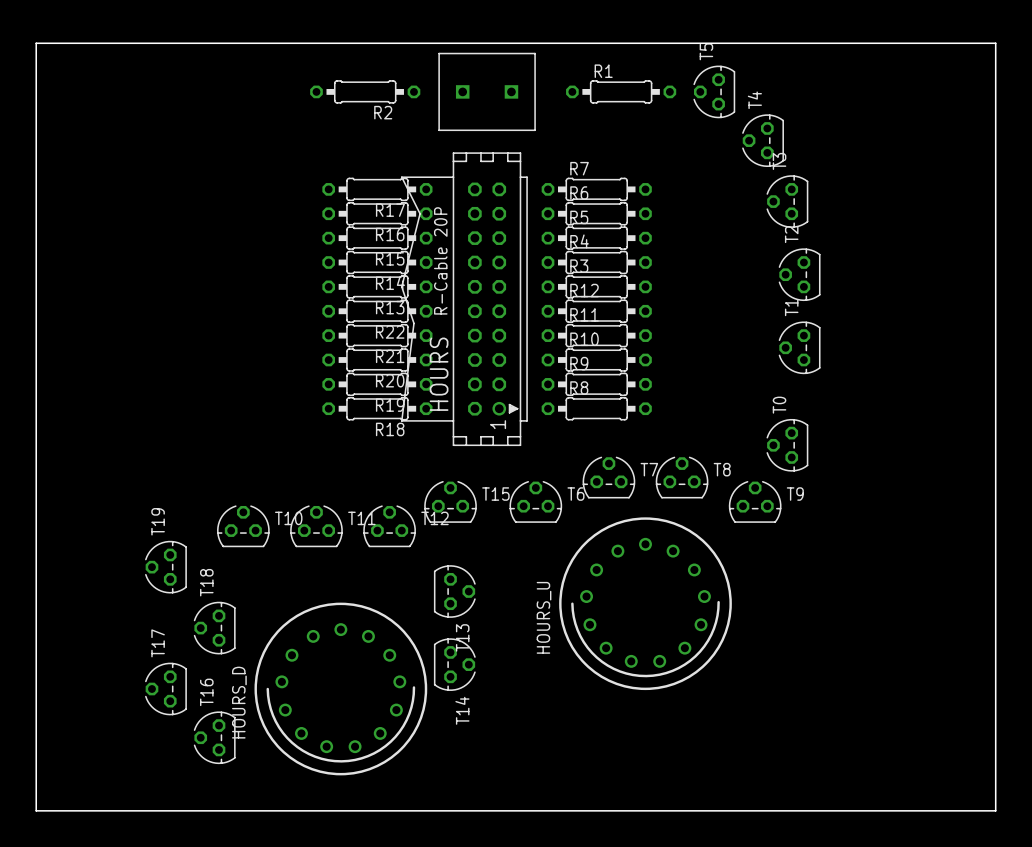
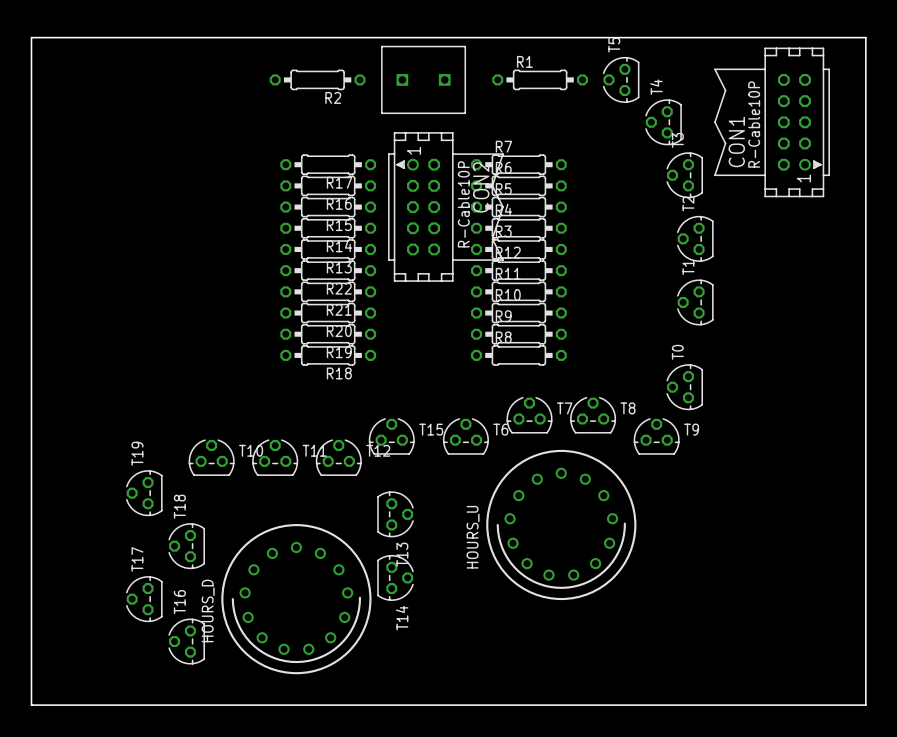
CON1: none -> (772, 122)
CON2: none -> (445, 206)
HOURS: (464, 299) -> none

